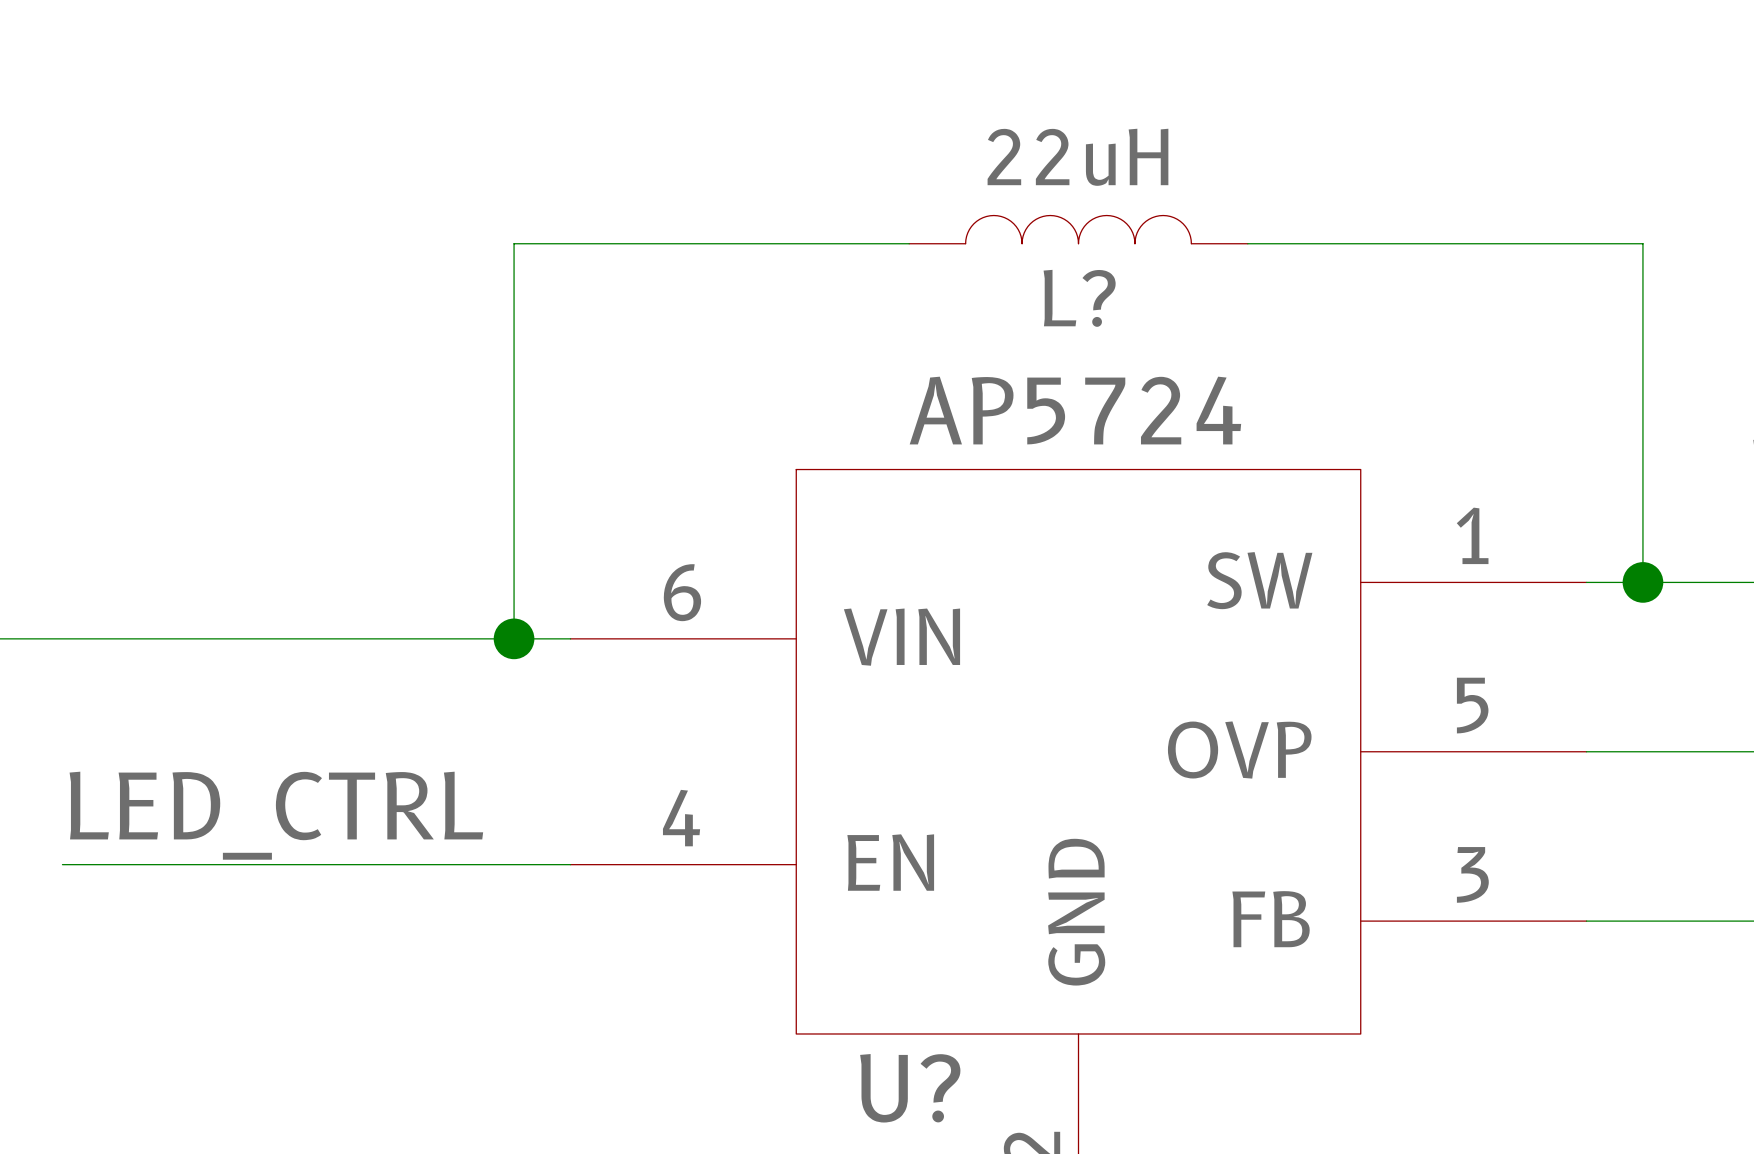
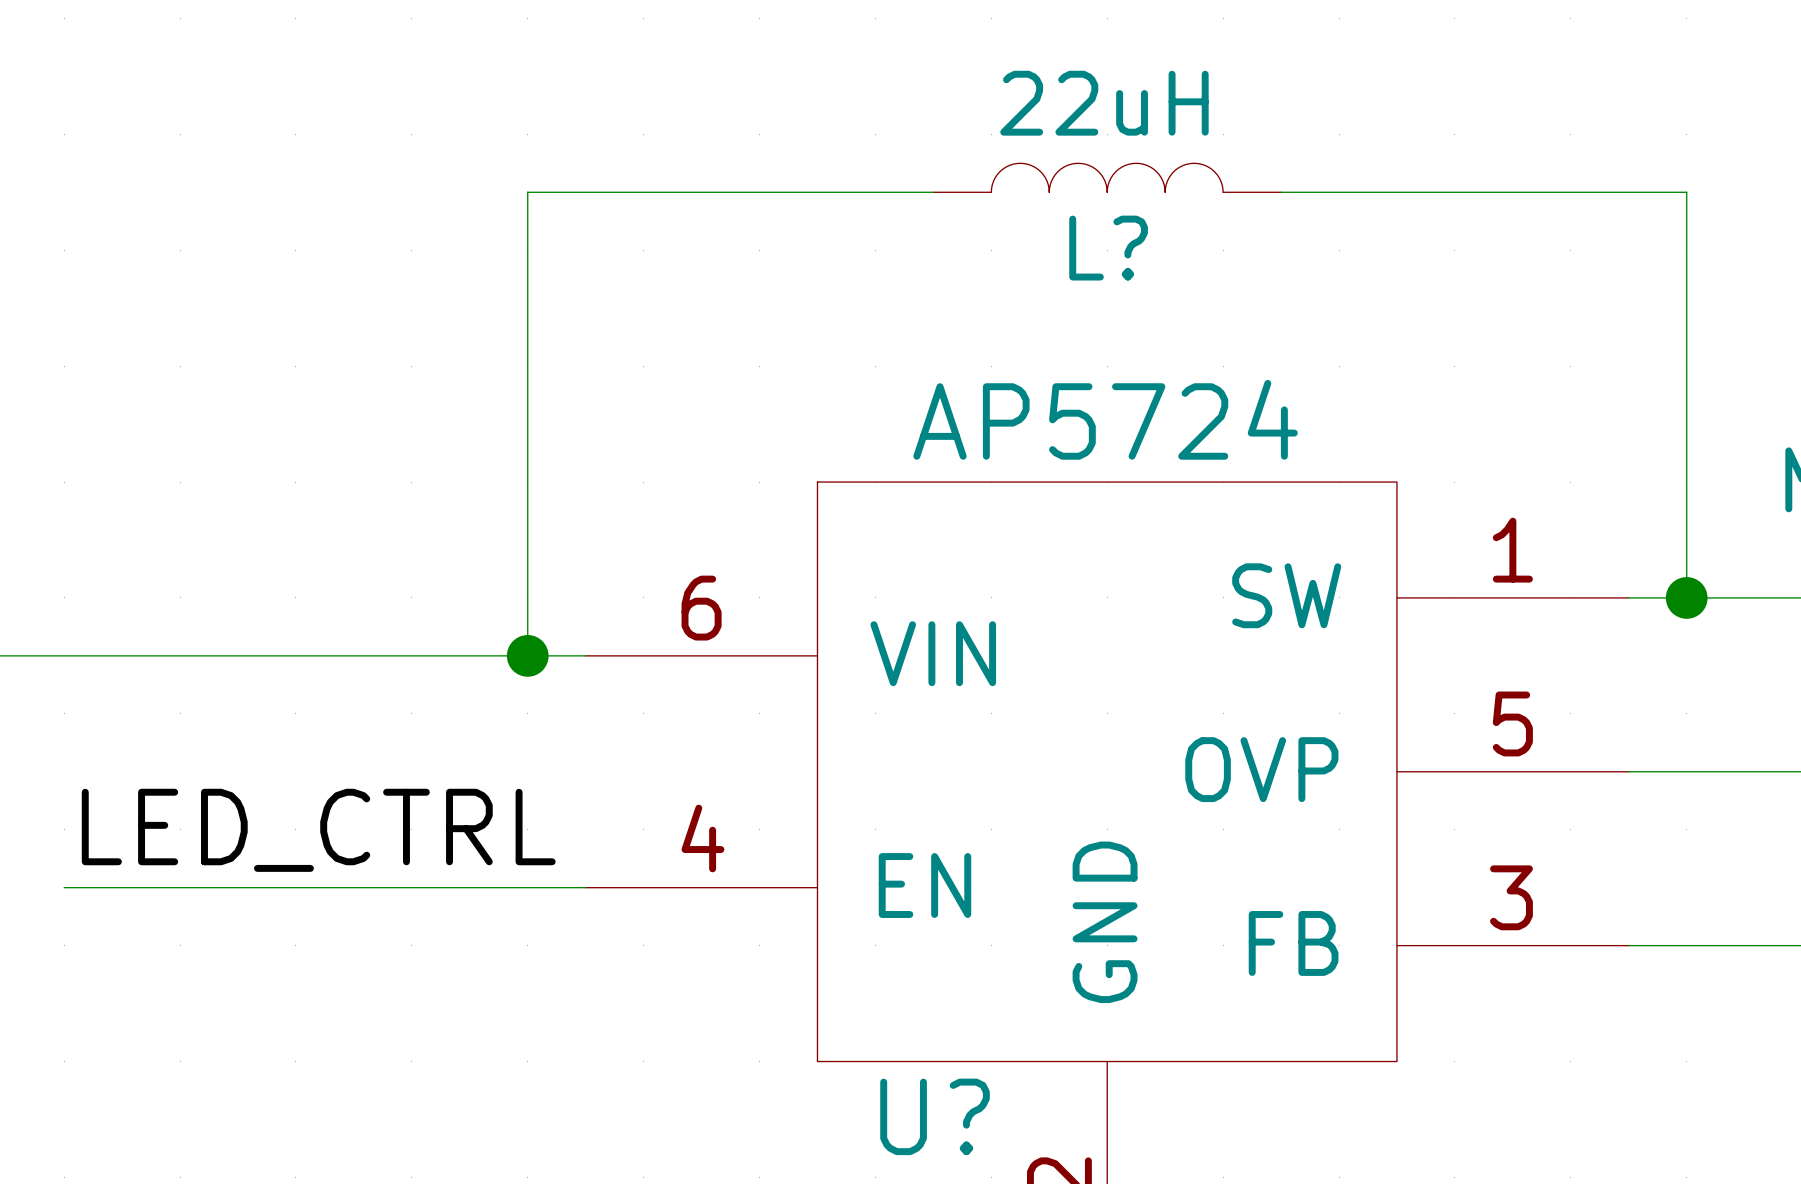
L? position: (1078, 229) -> (1107, 177)
wire: (514, 243) (909, 243) -> (527, 250) (527, 192) (933, 192)
wire: (1247, 243) (1642, 243) -> (1281, 192) (1686, 192) (1686, 250)

